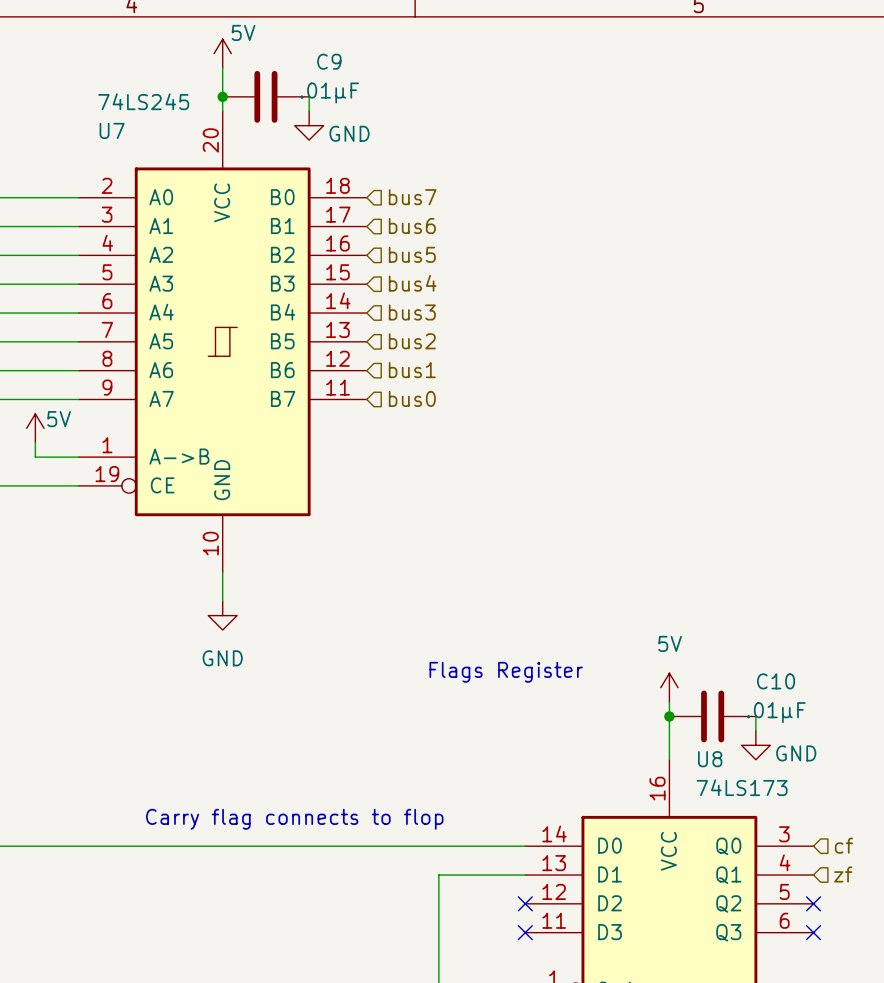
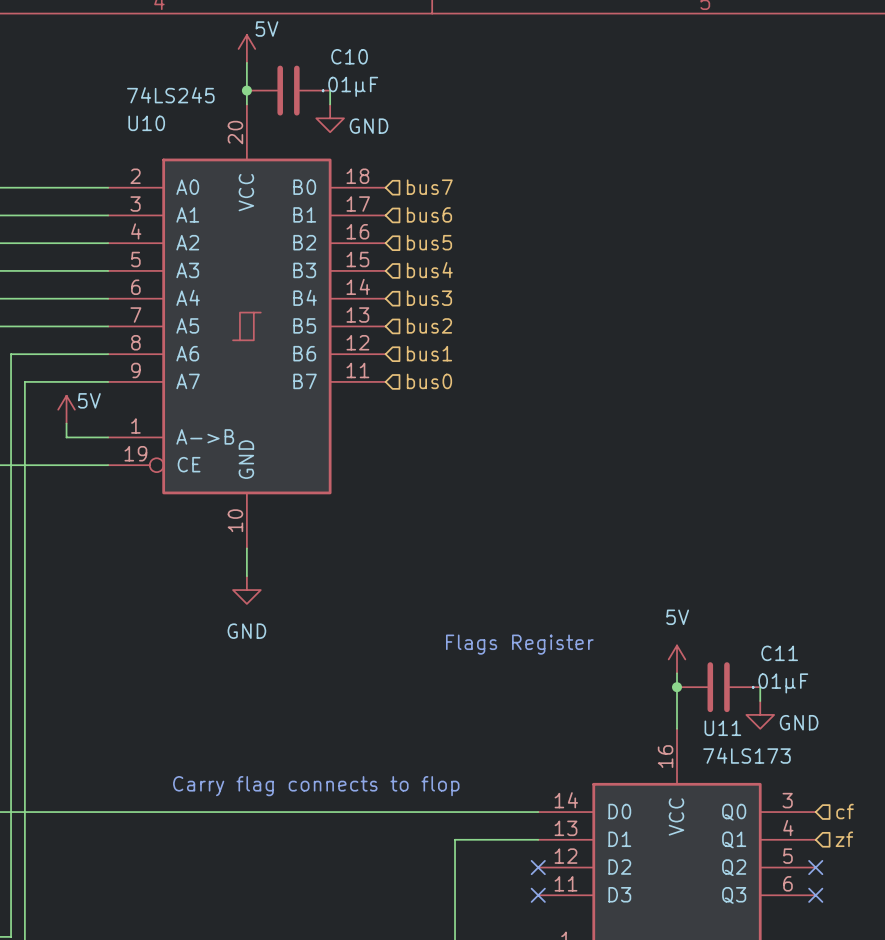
C9 name: C9 (329, 61) -> C10 (349, 56)
U7 name: U7 (112, 130) -> U10 (146, 123)
C10 name: C10 (776, 681) -> C11 (779, 653)
U8 name: U8 (710, 759) -> U11 (722, 728)

